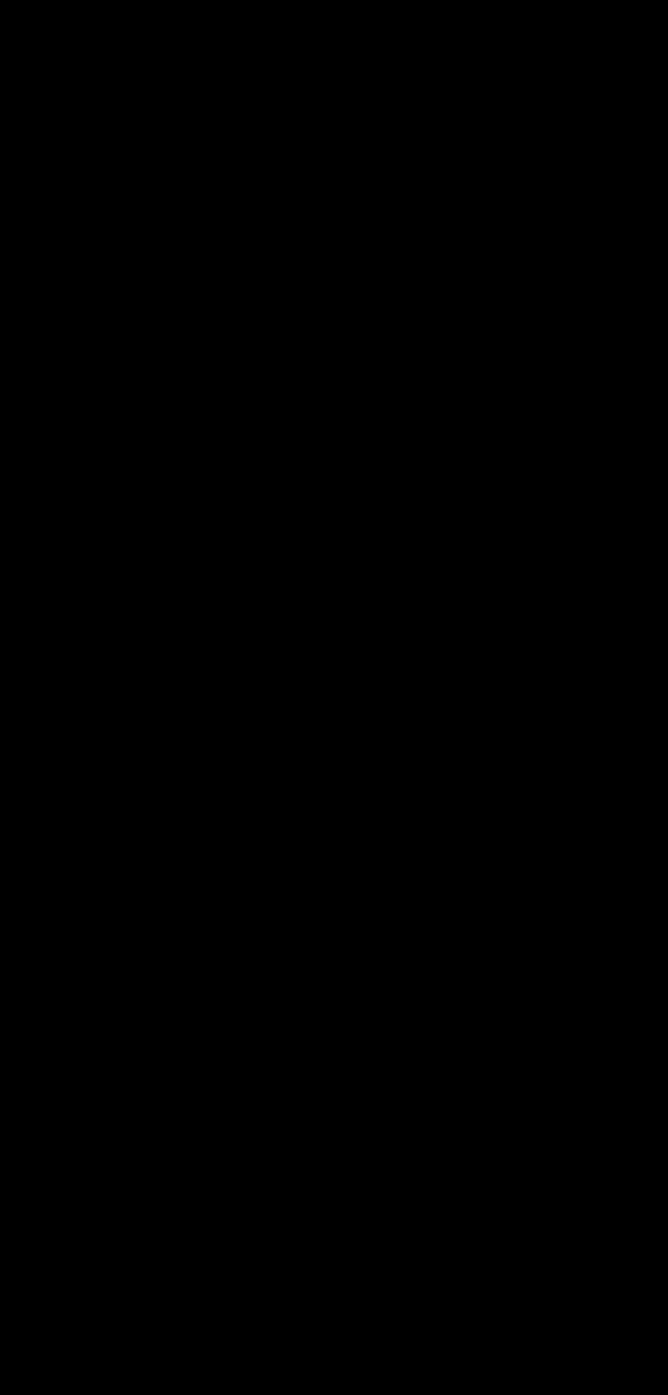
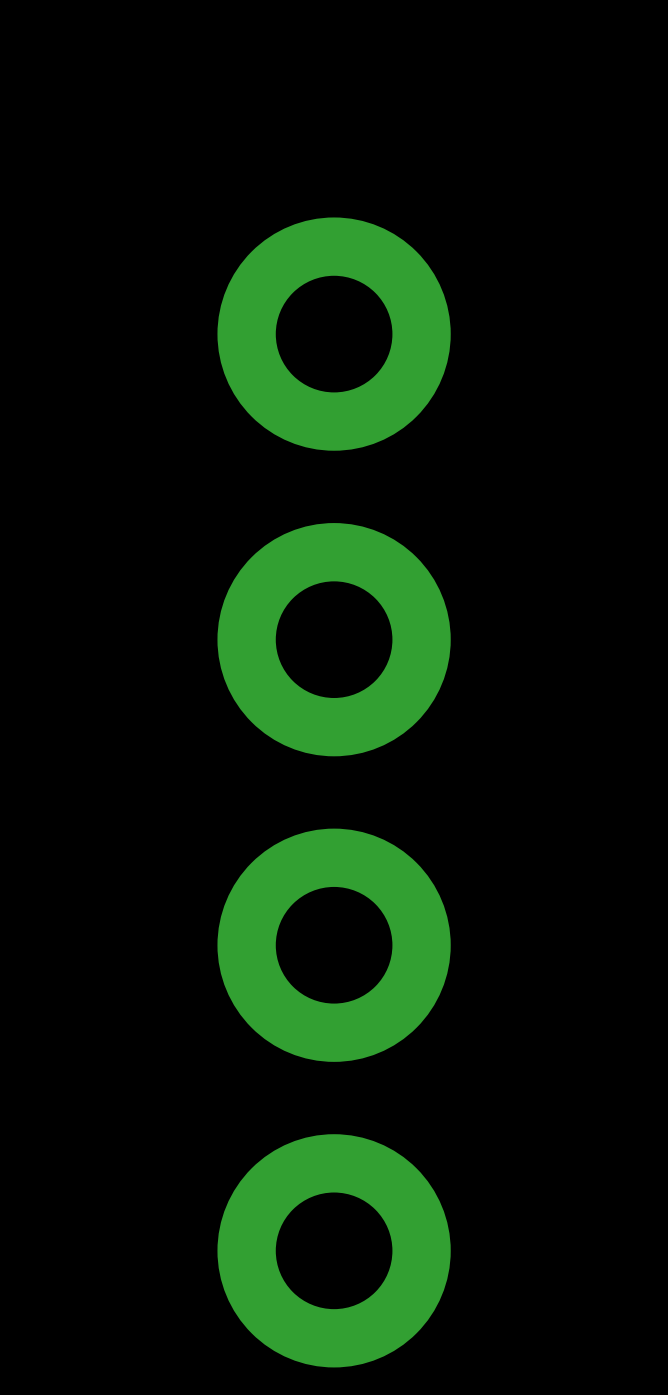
part: none -> (334, 334)
part: none -> (334, 639)
part: none -> (334, 945)
part: none -> (334, 1250)

